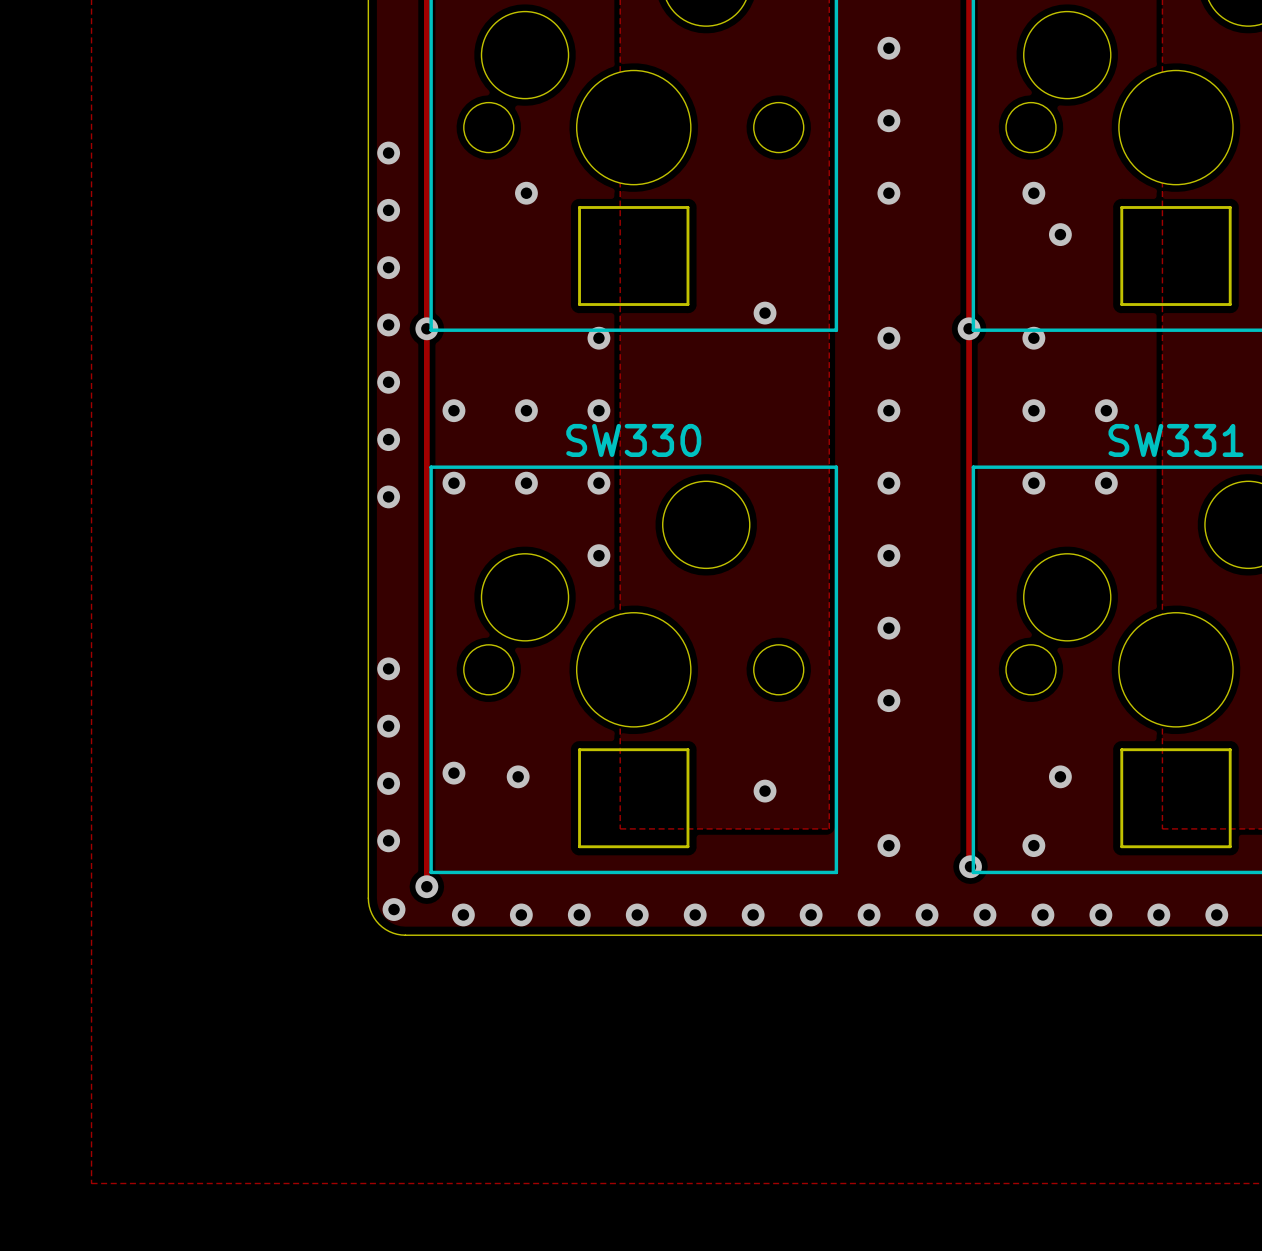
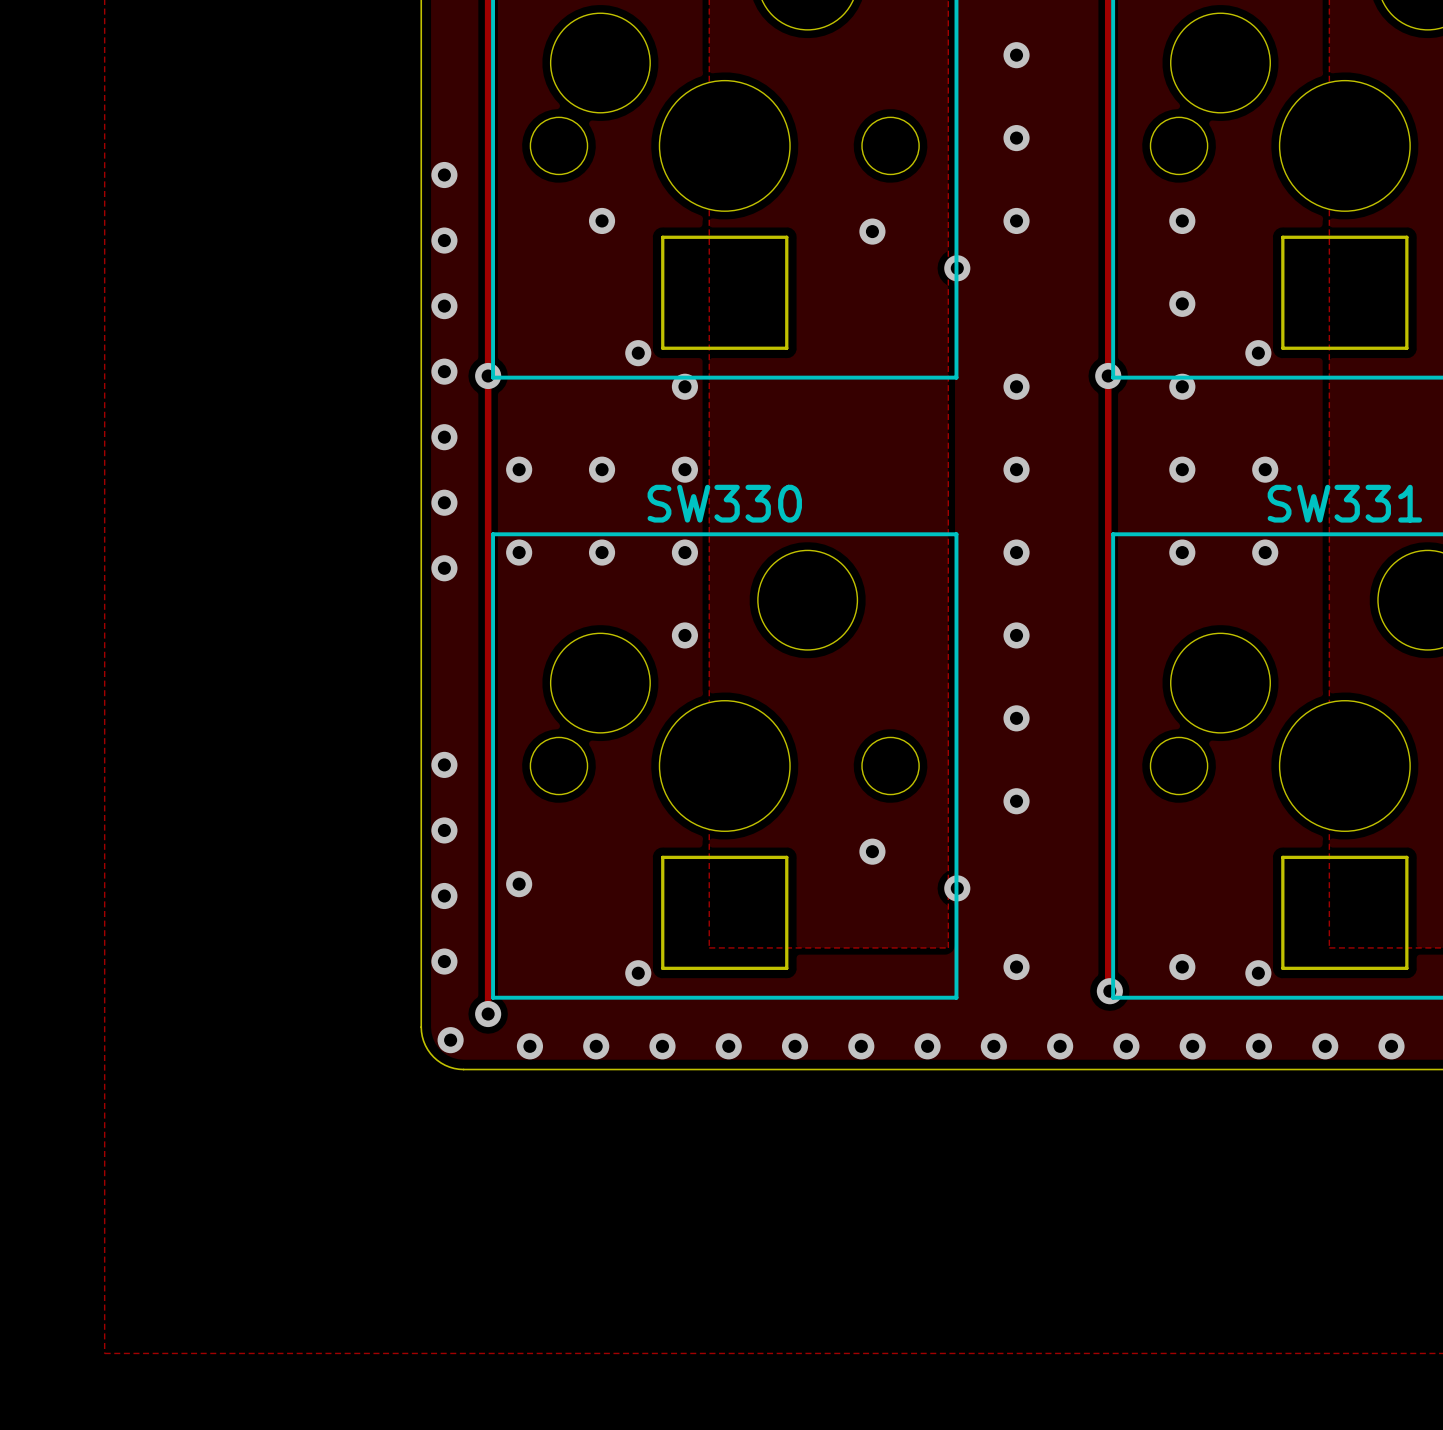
via: none -> (872, 231)
via: none -> (957, 268)
via position: (1060, 234) -> (1182, 303)
via: none -> (638, 353)
via: none -> (1258, 353)
via: (765, 313) -> none
via: none -> (872, 851)
via position: (518, 776) -> (638, 973)
via: none -> (957, 888)
via position: (1060, 776) -> (1258, 973)
via: (765, 791) -> none

